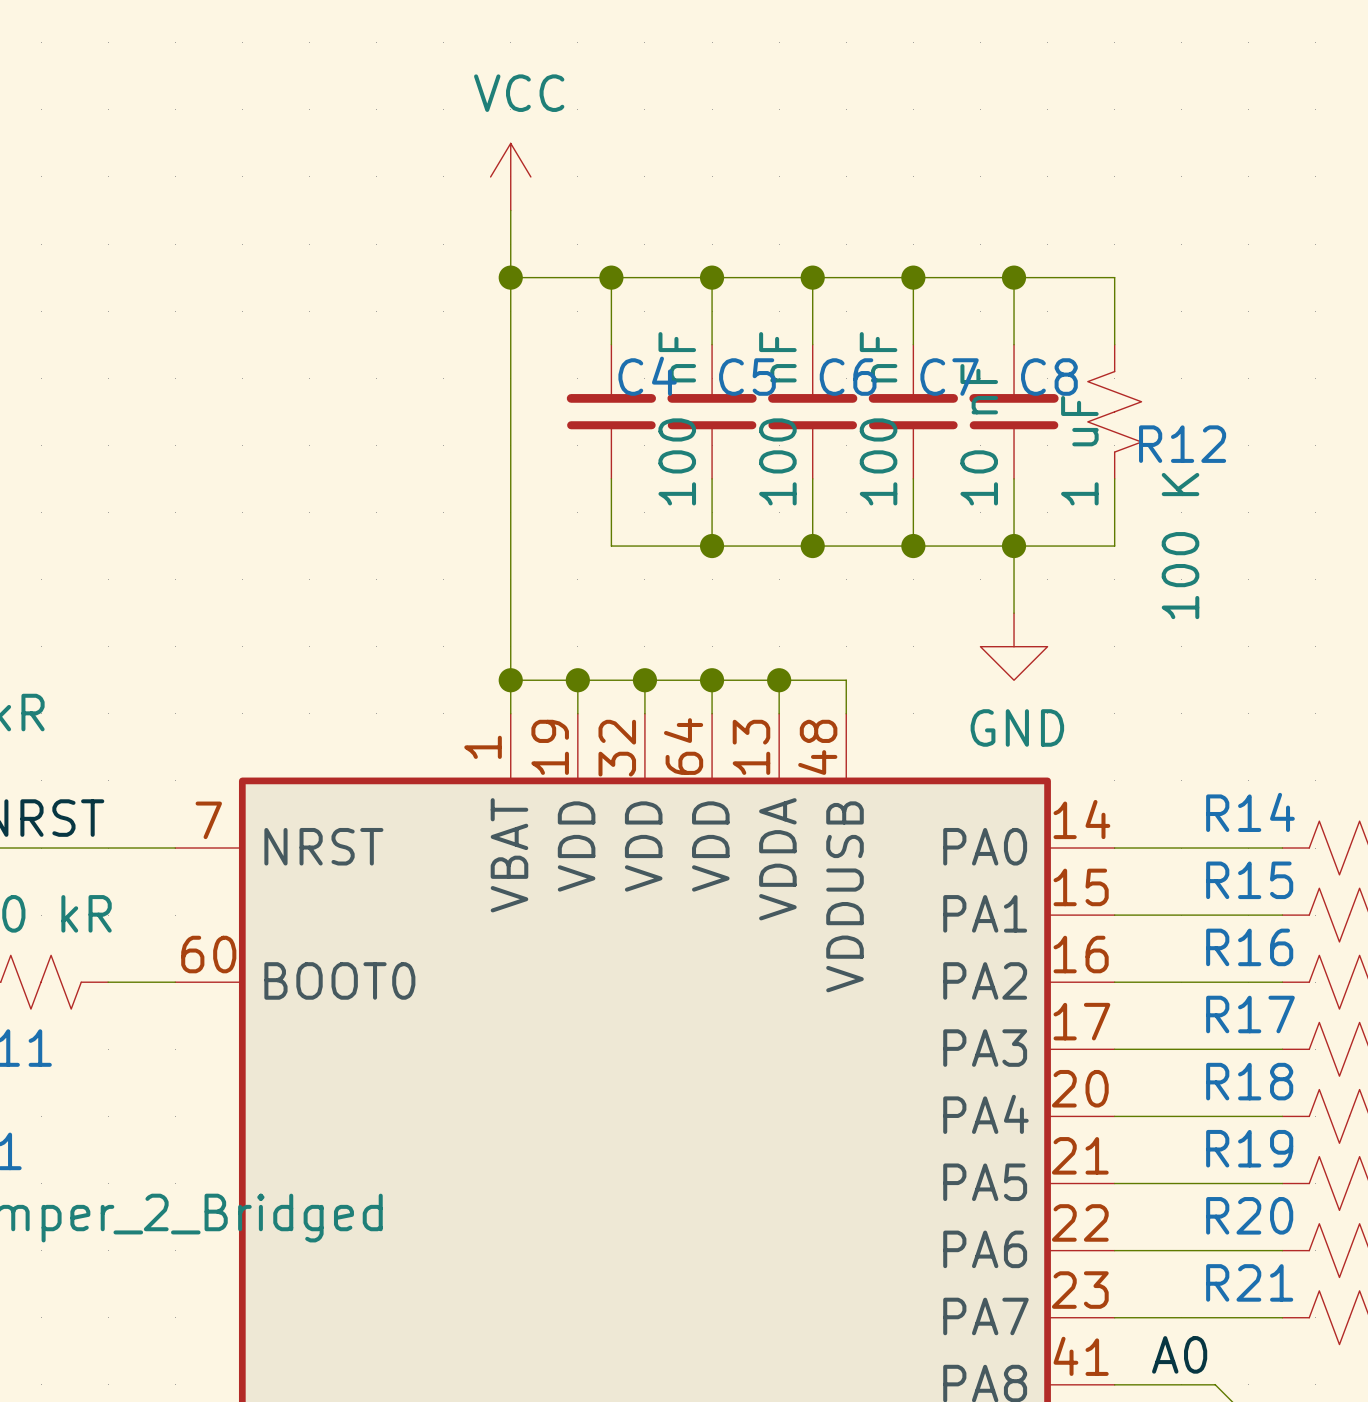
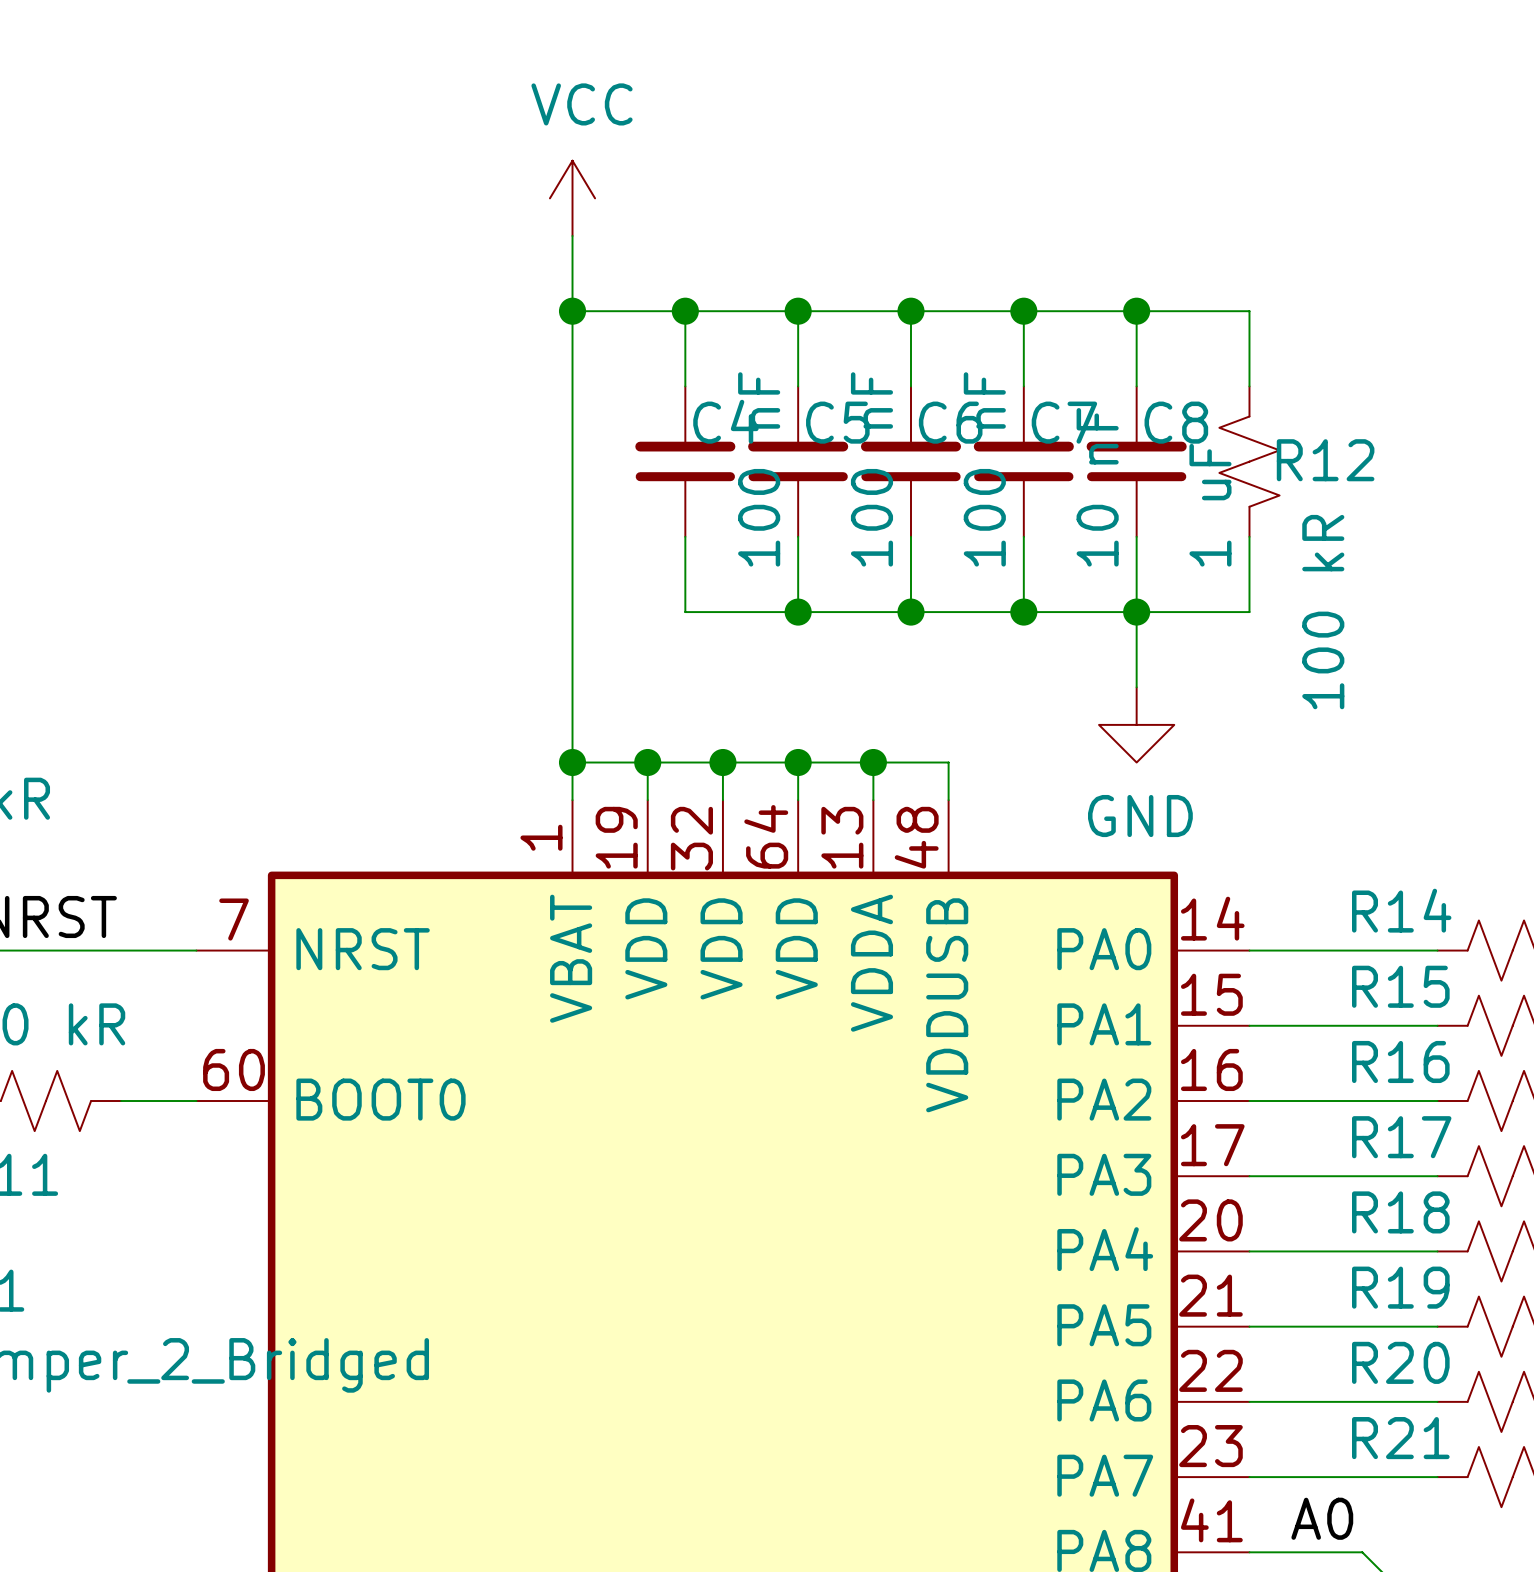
R12 name position: R12 (1182, 444) -> R12 (1325, 460)
R12 value: 100 K (1180, 546) -> 100 kR (1323, 612)

